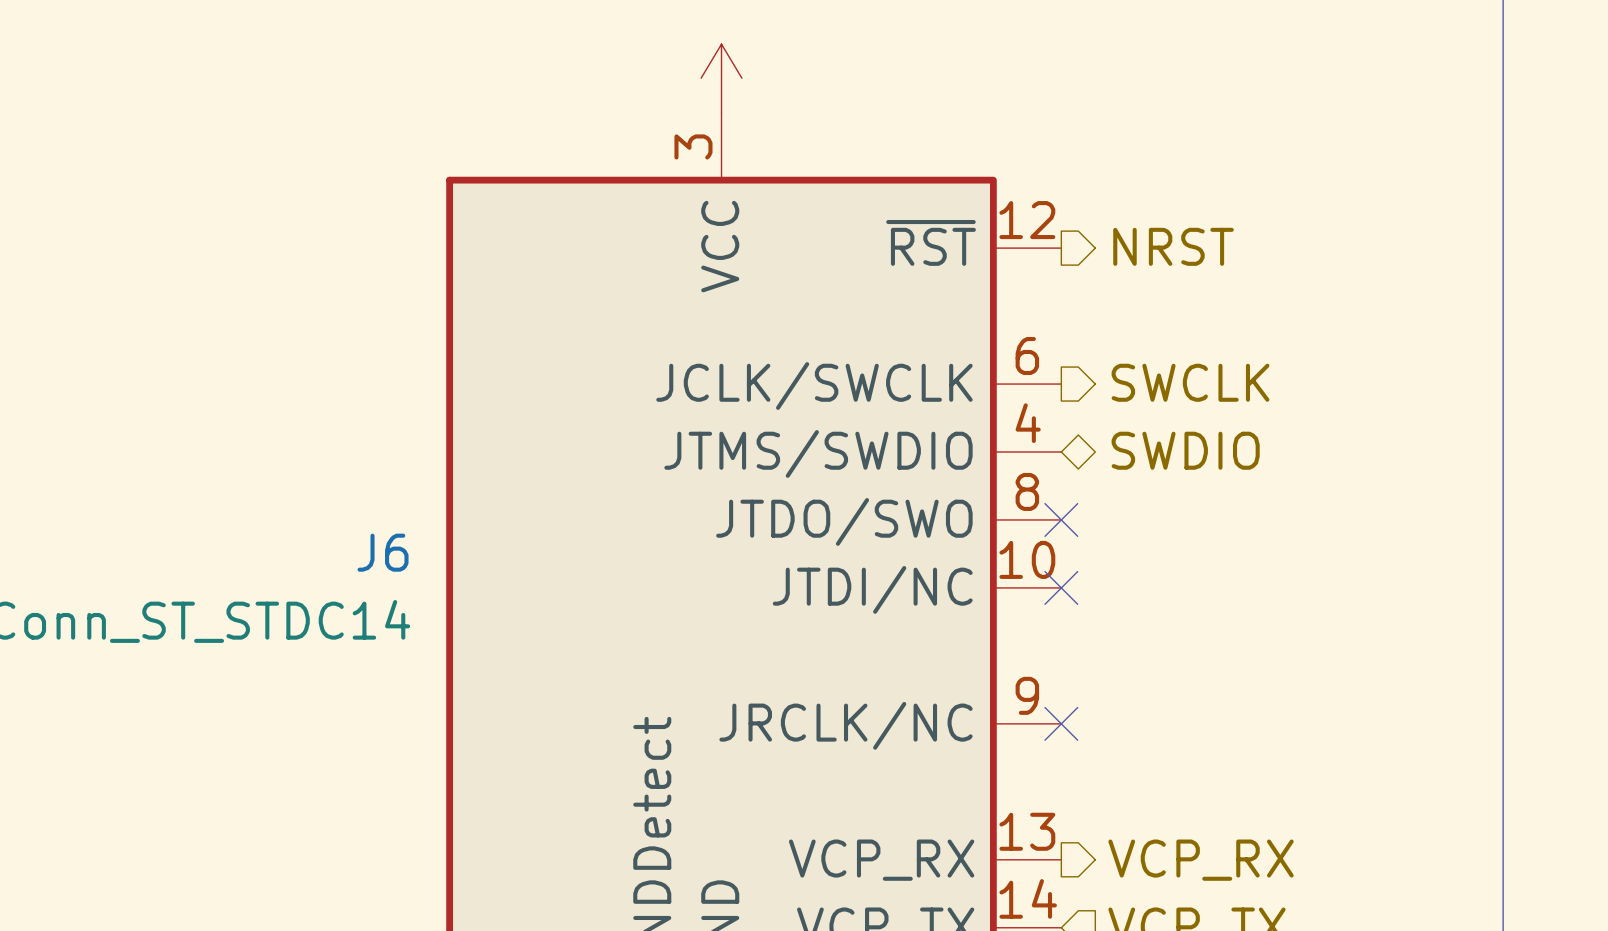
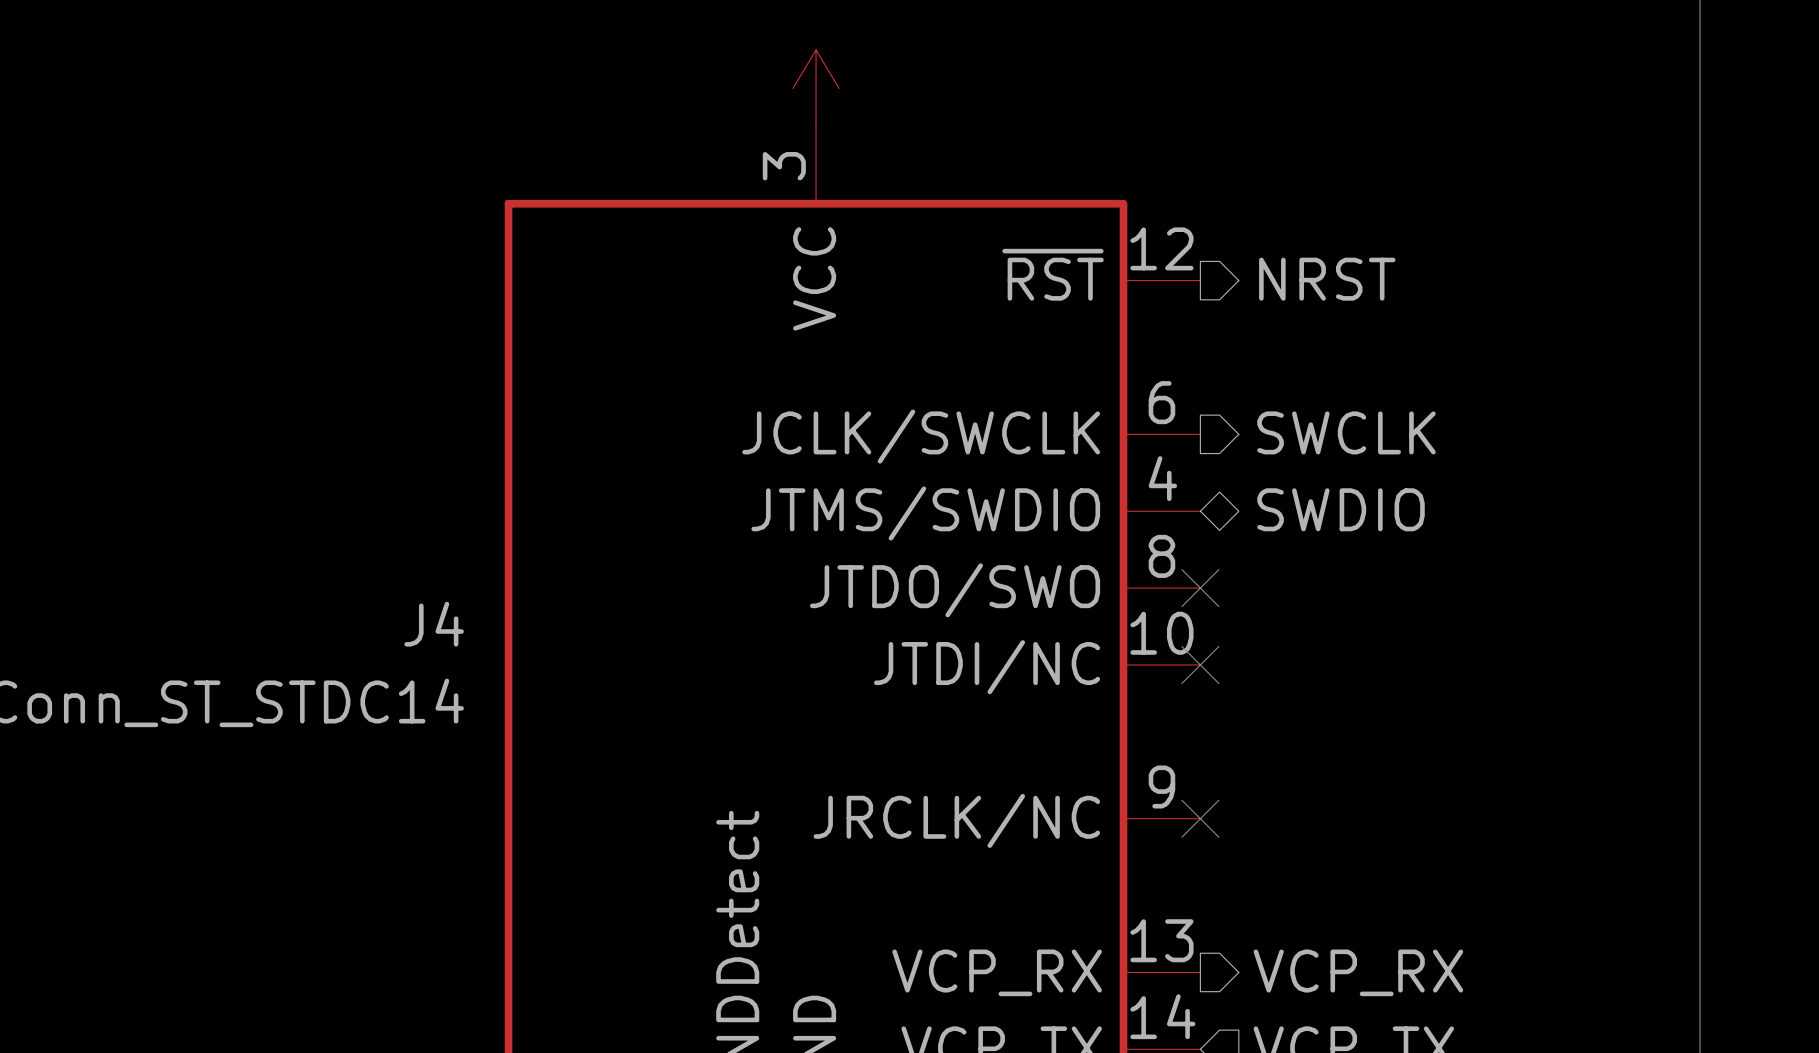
J6 name: J6 (383, 552) -> J4 (434, 624)

